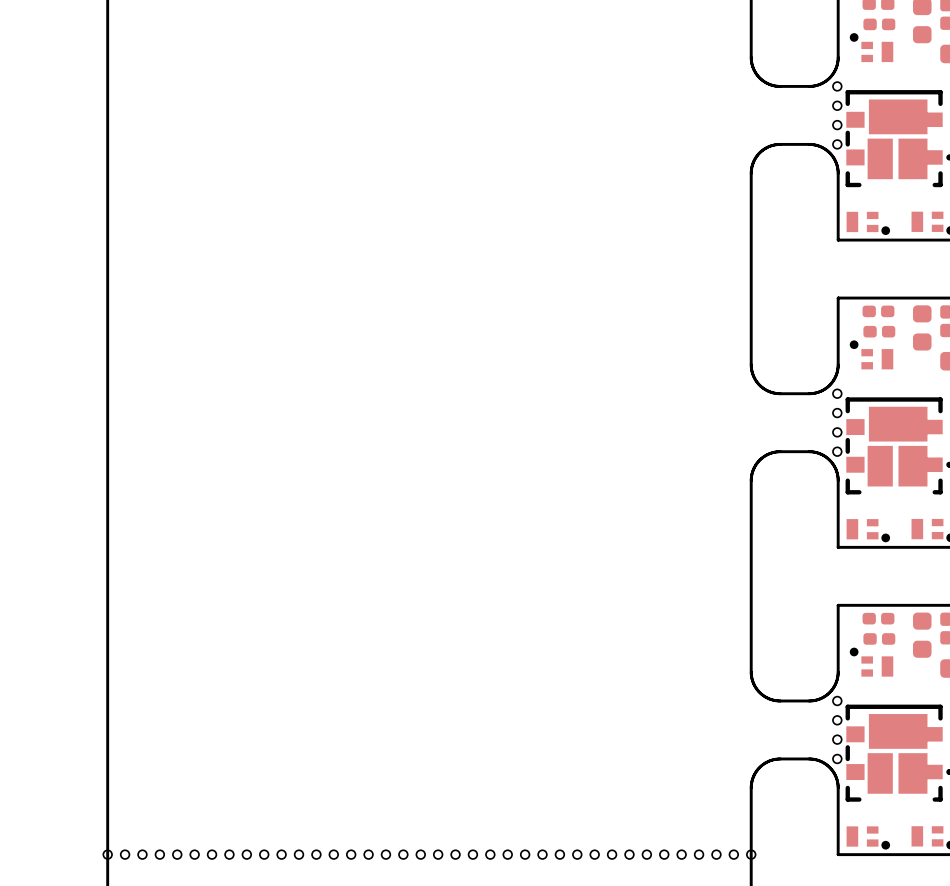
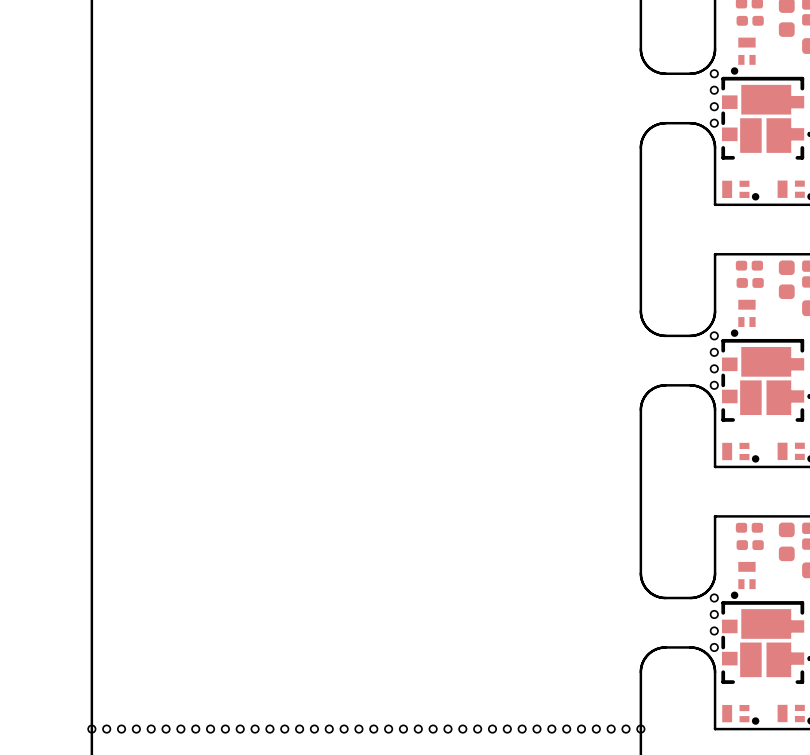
part rotation: 0° (871, 47) -> 90° counterclockwise (743, 56)
part rotation: 0° (871, 354) -> 90° counterclockwise (743, 318)
part rotation: 0° (871, 662) -> 90° counterclockwise (743, 580)

